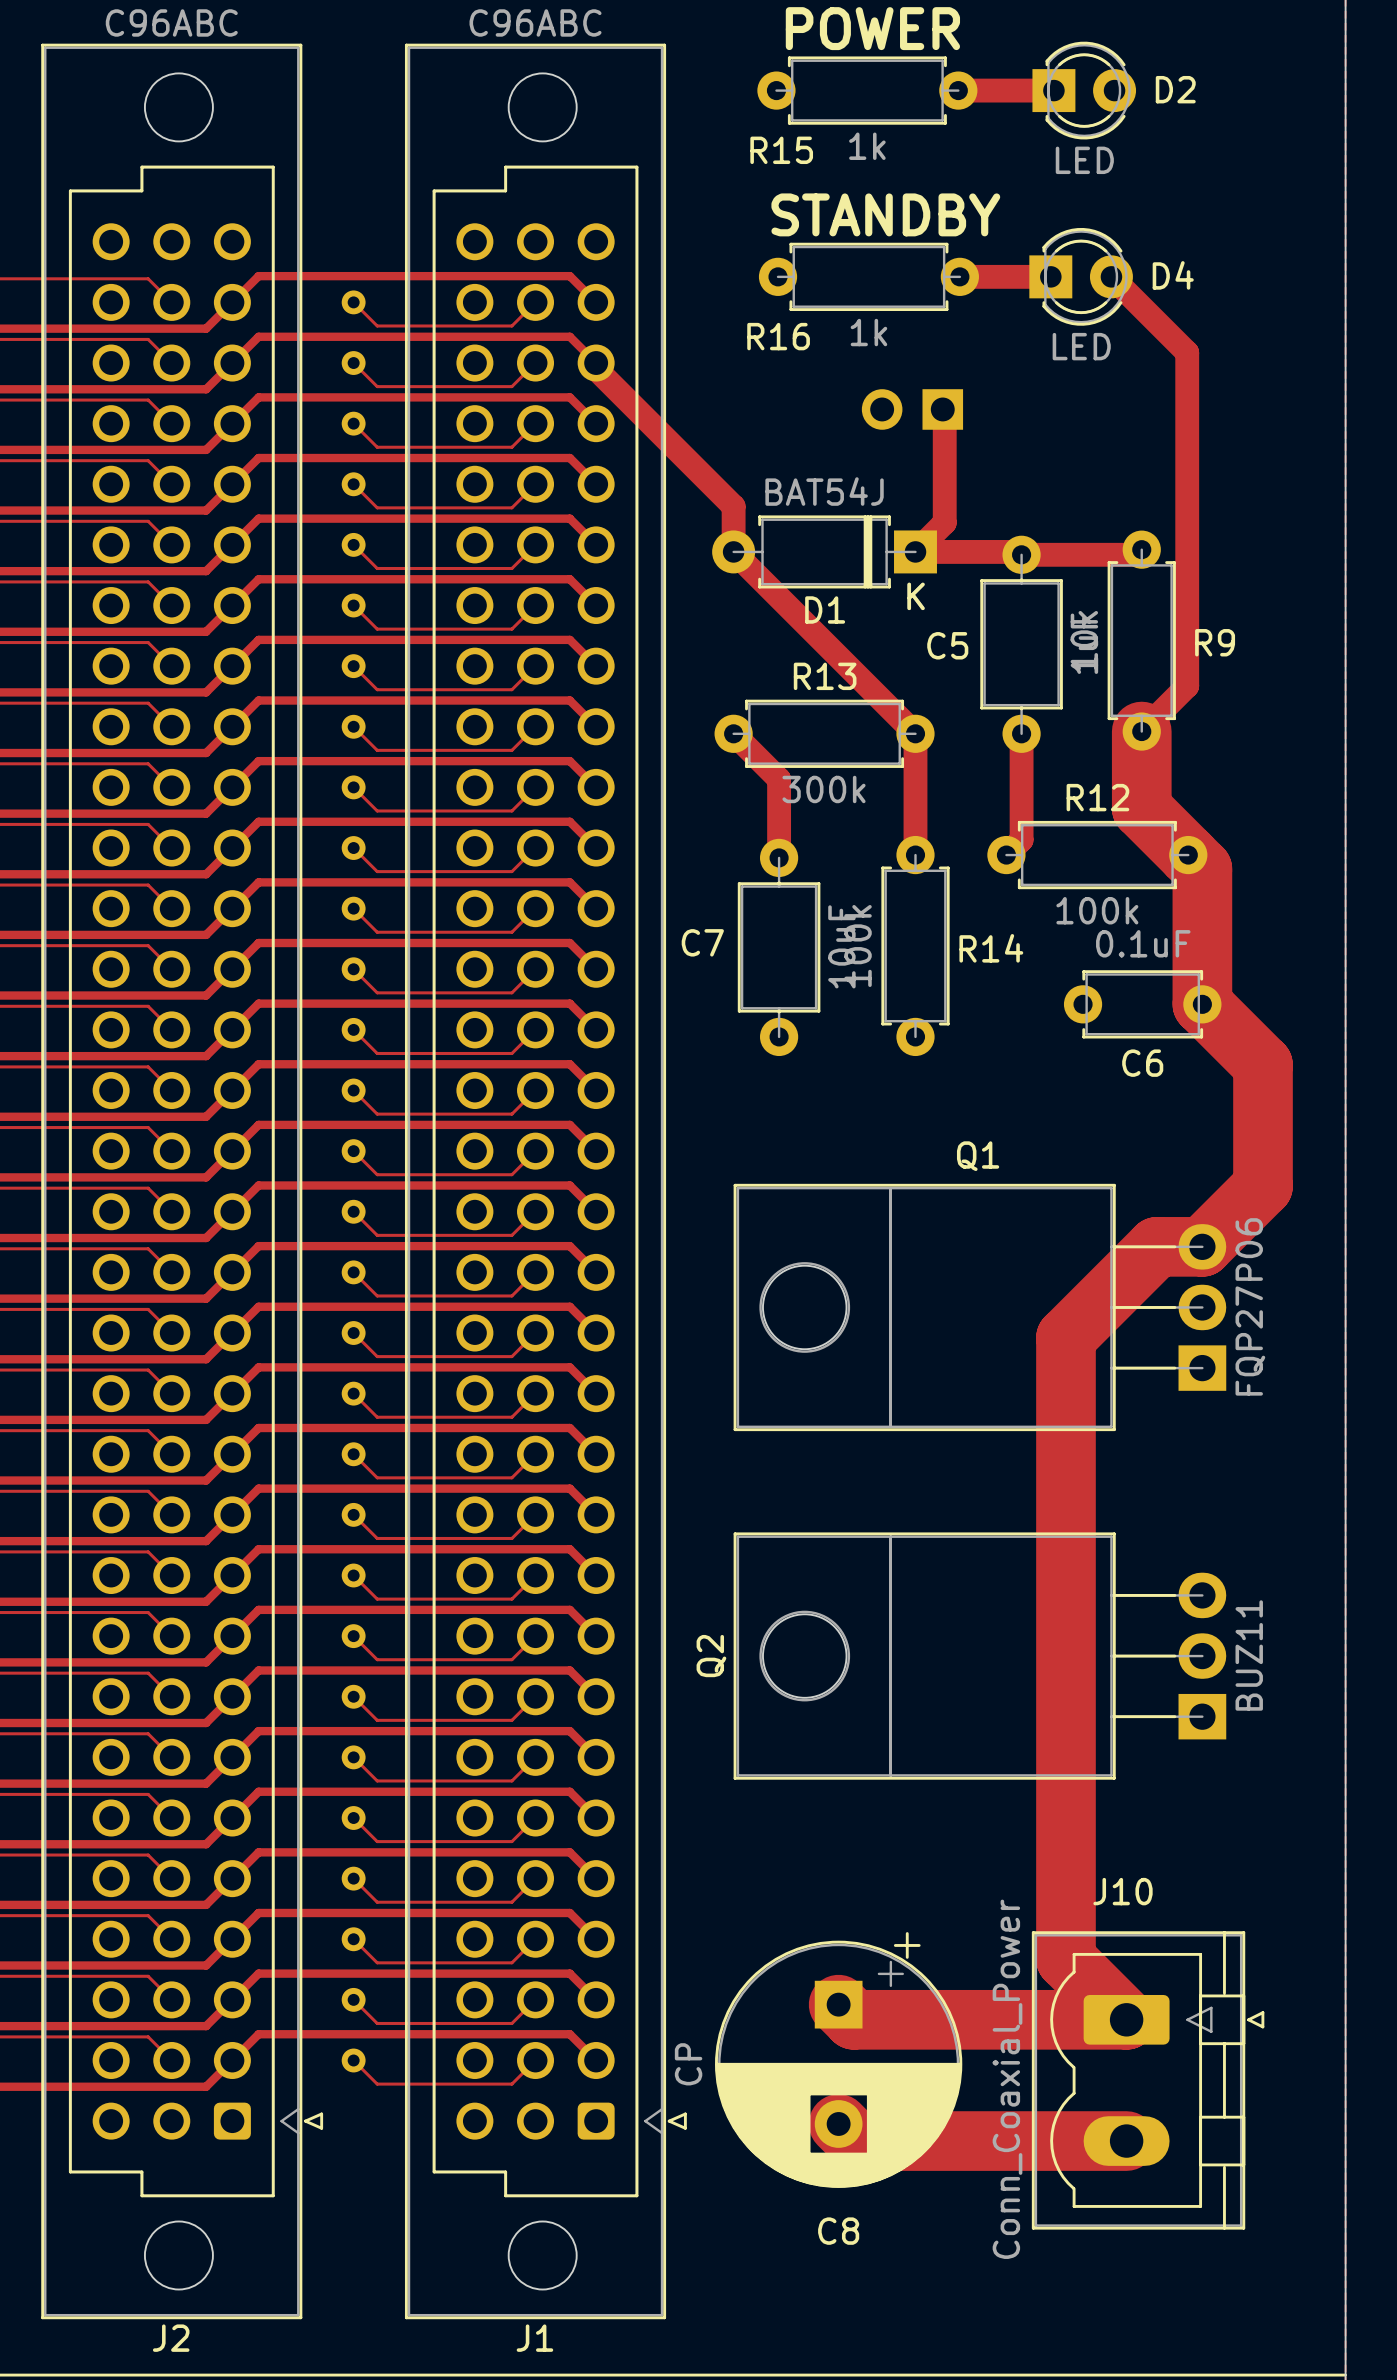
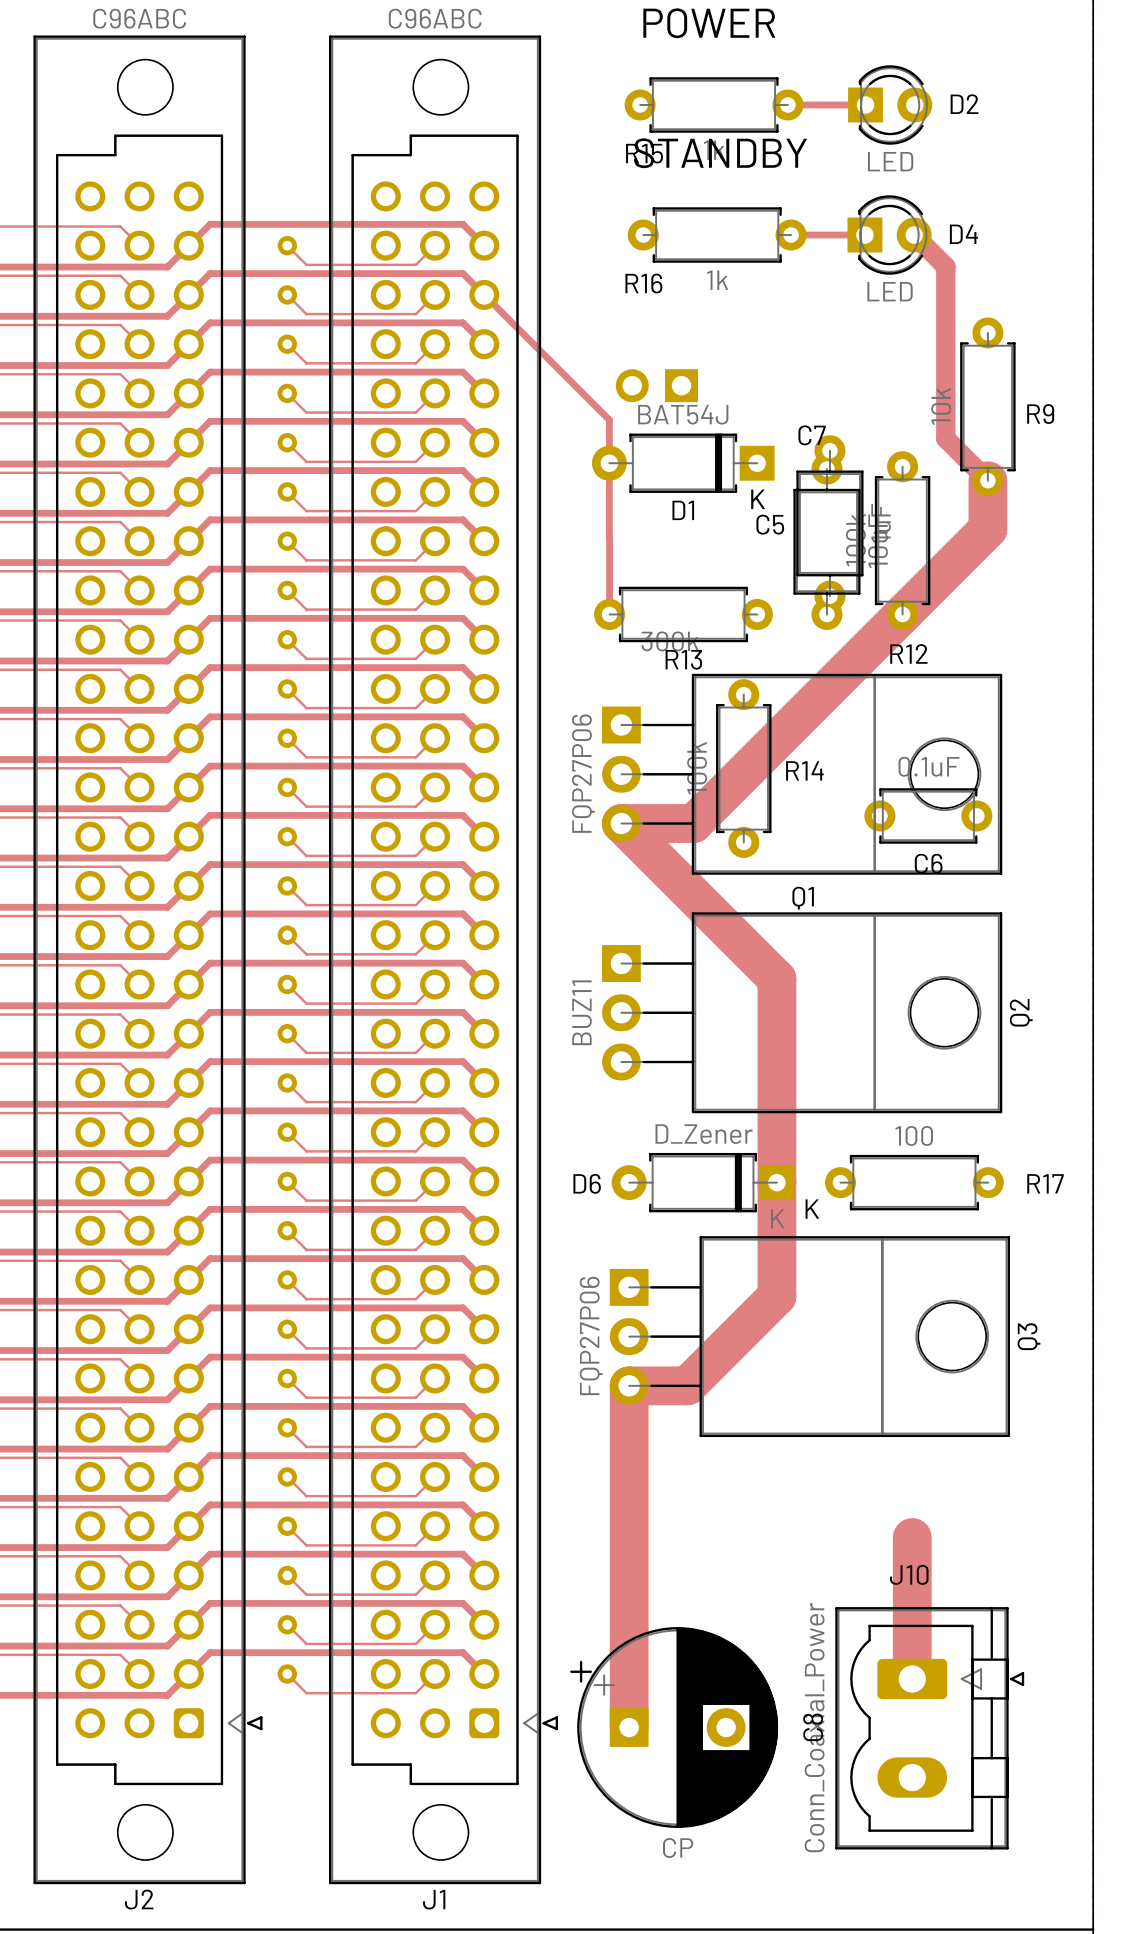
R15 position: (867, 90) -> (714, 105)
track: (958, 90) (1053, 90) -> (787, 105) (865, 105)
D2 position: (1084, 90) -> (890, 105)
text position: STANDBY (885, 214) -> STANDBY (720, 153)
R16 position: (868, 276) -> (717, 235)
track: (959, 276) (1050, 276) -> (791, 235) (864, 235)
D4 position: (1081, 276) -> (889, 235)
track: (1111, 276) (1187, 352) (1187, 686) (1141, 731) (1141, 808) (1202, 869) (1202, 1004) (1263, 1064) (1263, 1186) (1202, 1246) (1156, 1246) (1065, 1337) (1065, 1959) (1126, 2019) (853, 2019) (838, 2004) -> none
track: none -> (914, 235) (945, 266) (945, 438) (987, 480) (987, 529) (693, 823) (621, 823) (776, 979) (776, 1296) (687, 1385) (629, 1385) (629, 1727)
track: none -> (484, 294) (609, 420) (609, 538)
track: (596, 368) (733, 506) (733, 551) (915, 733) (915, 855) -> none
part position: (912, 409) -> (656, 385)
track: (942, 409) (944, 411) (944, 522) (915, 551) (1136, 554) (1141, 549) -> none
D1 position: (824, 551) -> (683, 463)
R9 position: (1141, 640) -> (987, 406)
R9 name position: R9 (1215, 642) -> R9 (1040, 414)
track: none -> (609, 539) (609, 614)
R13 name position: R13 (825, 676) -> R13 (683, 659)
track: (733, 733) (779, 779) (779, 857) -> none
R13 position: (824, 733) -> (683, 614)
track: (1021, 733) (1021, 839) (1006, 855) -> none
R12 name position: R12 (1097, 797) -> R12 (908, 653)
R12 rotation: 0° (1097, 855) -> 90° clockwise (902, 540)
R12 position: (1097, 855) -> (902, 540)
C7 name position: C7 (702, 942) -> C7 (812, 435)
C7 position: (779, 947) -> (826, 541)
Q1 rotation: 0° (979, 1307) -> 180° (802, 774)
Q1 position: (979, 1307) -> (802, 774)
D6: none -> D_Zener (703, 1182)
R17: none -> 100 (914, 1182)
Q3: none -> FQP27P06 (809, 1336)
Q2 rotation: 0° (979, 1656) -> 180° (802, 1012)
Q2 position: (979, 1656) -> (802, 1012)
track: none -> (912, 1537) (912, 1679)
C8 rotation: 0° (838, 2060) -> 90° counterclockwise (674, 1727)
J10 position: (1148, 2080) -> (929, 1728)
track: (838, 2123) (855, 2141) (1126, 2141) -> none

